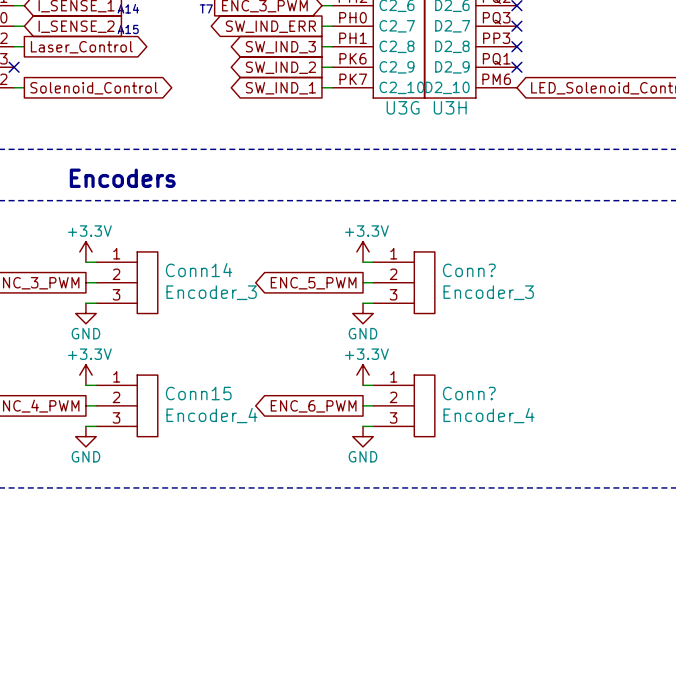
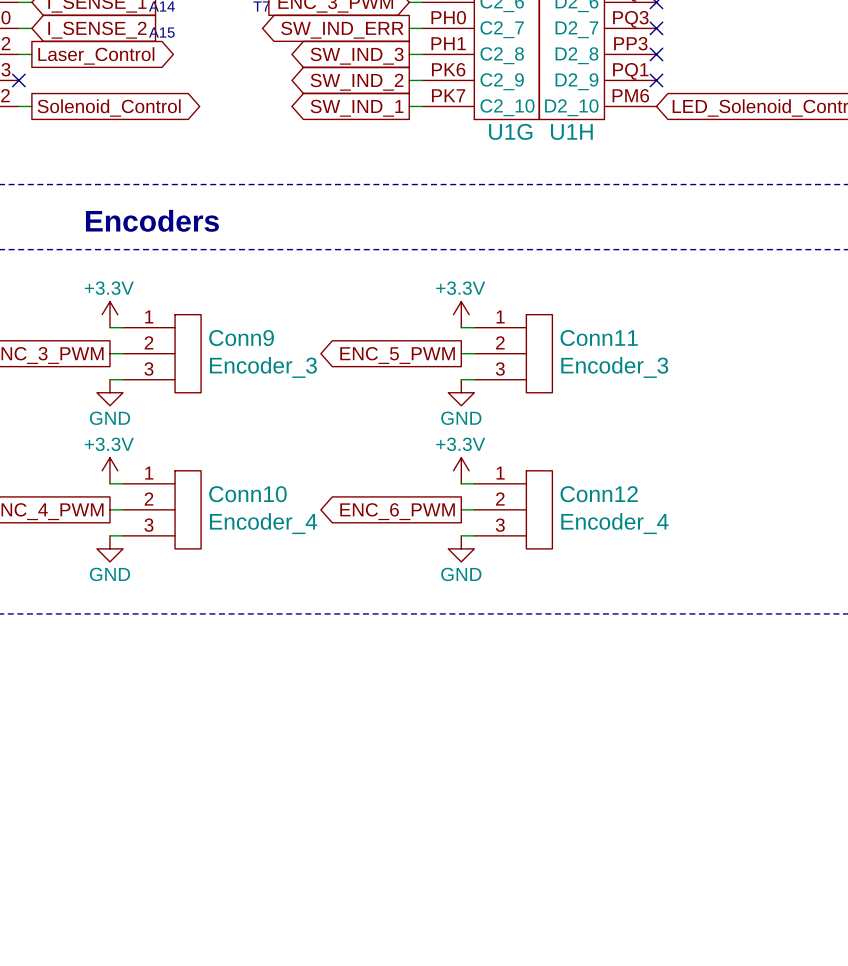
U3G name: U3G (403, 107) -> U1G (510, 131)
U3H name: U3H (450, 107) -> U1H (571, 132)
Conn14 name: Conn14 (199, 270) -> Conn9 (241, 338)
Conn? name: Conn? (469, 270) -> Conn11 (599, 338)
Conn15 name: Conn15 (198, 393) -> Conn10 (247, 494)
Conn? name: Conn? (469, 393) -> Conn12 (599, 494)

